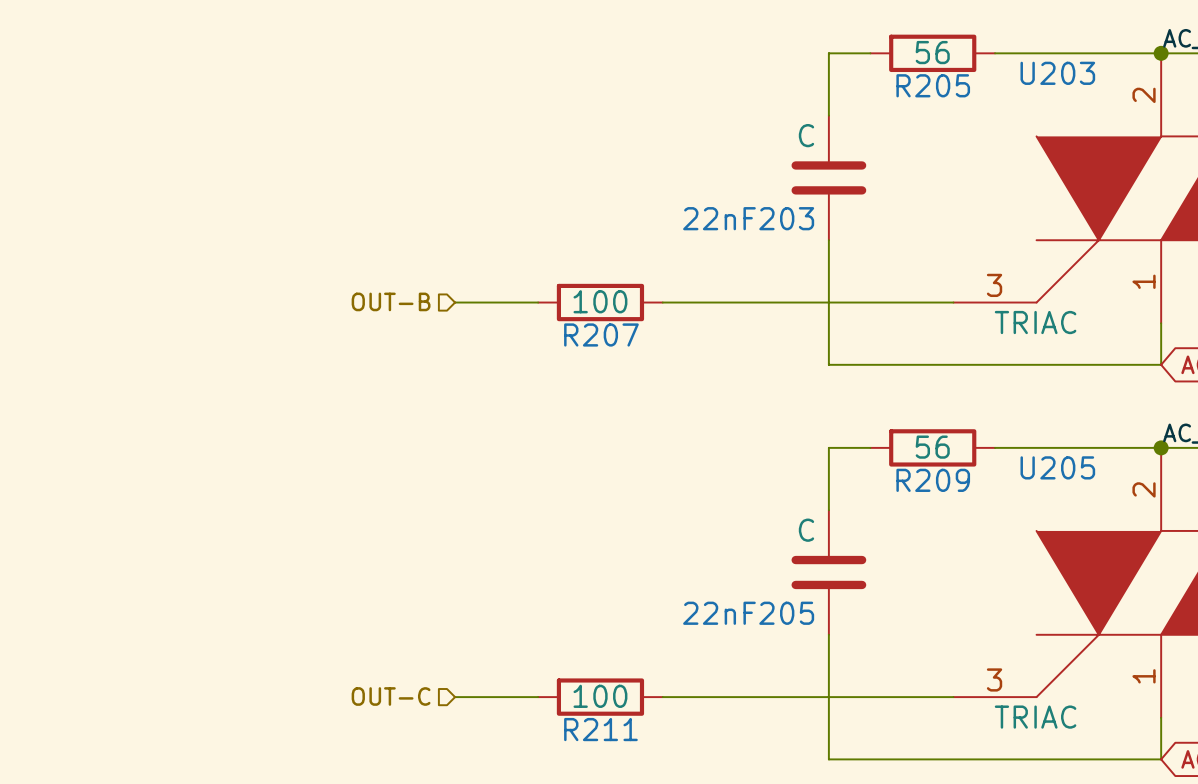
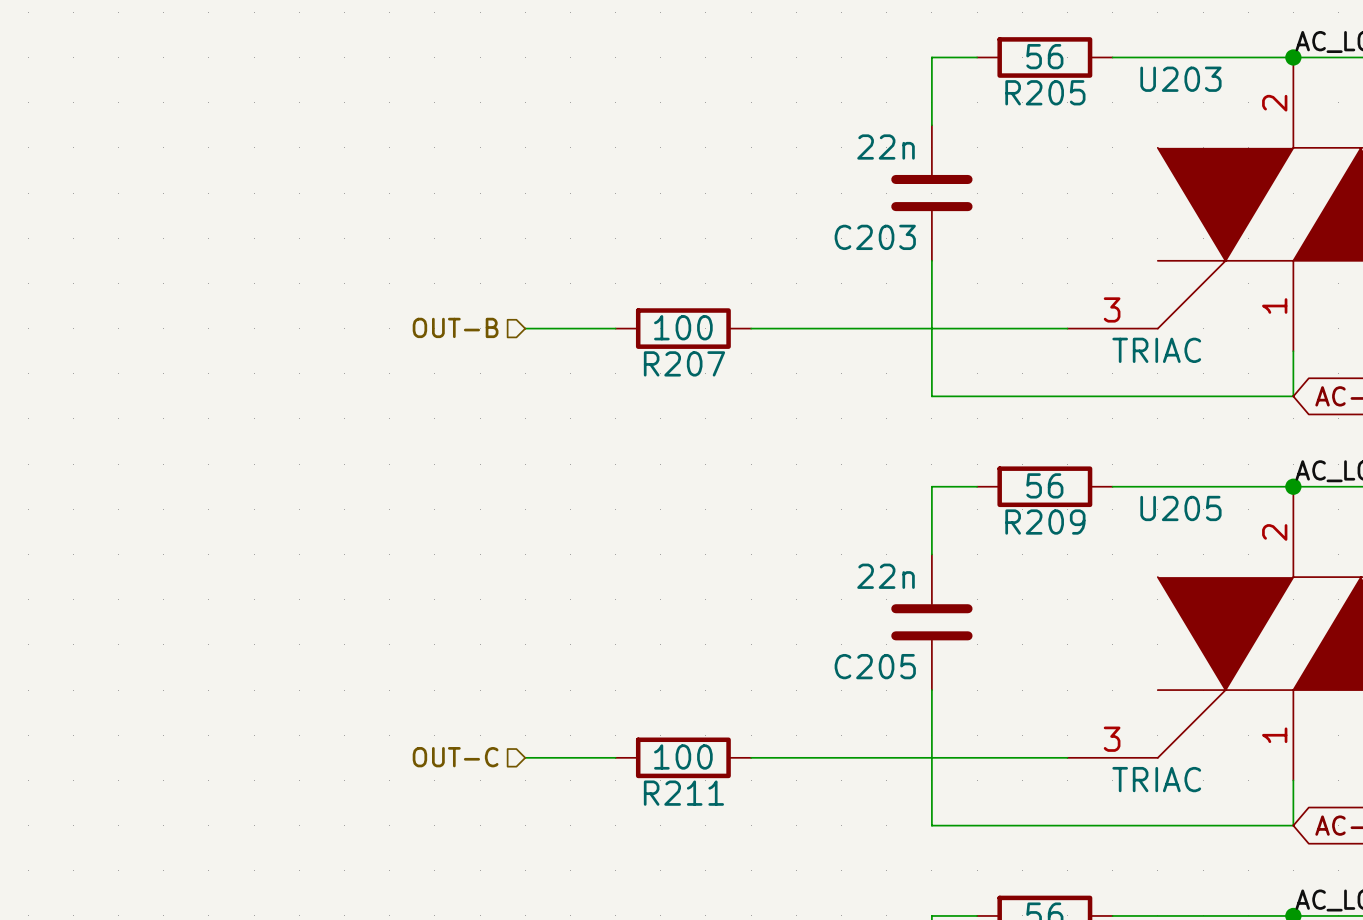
22nF203 value: C (806, 135) -> 22n (886, 147)
22nF203 name: 22nF203 (748, 218) -> C203 (875, 237)
22nF205 value: C (806, 530) -> 22n (886, 576)
22nF205 name: 22nF205 (748, 613) -> C205 (875, 666)

